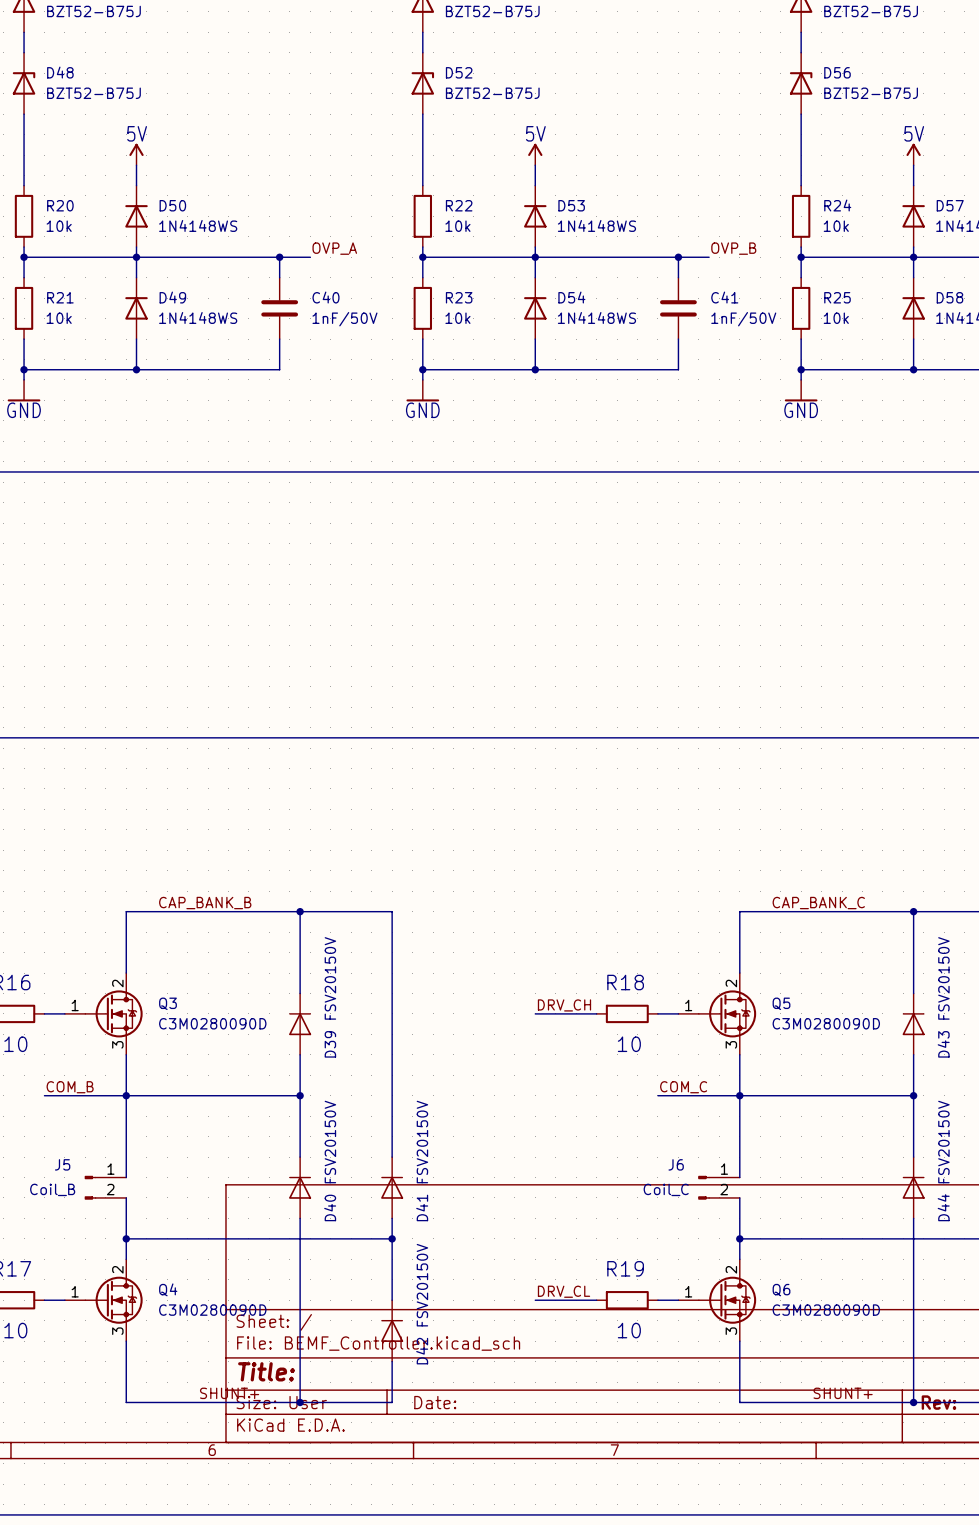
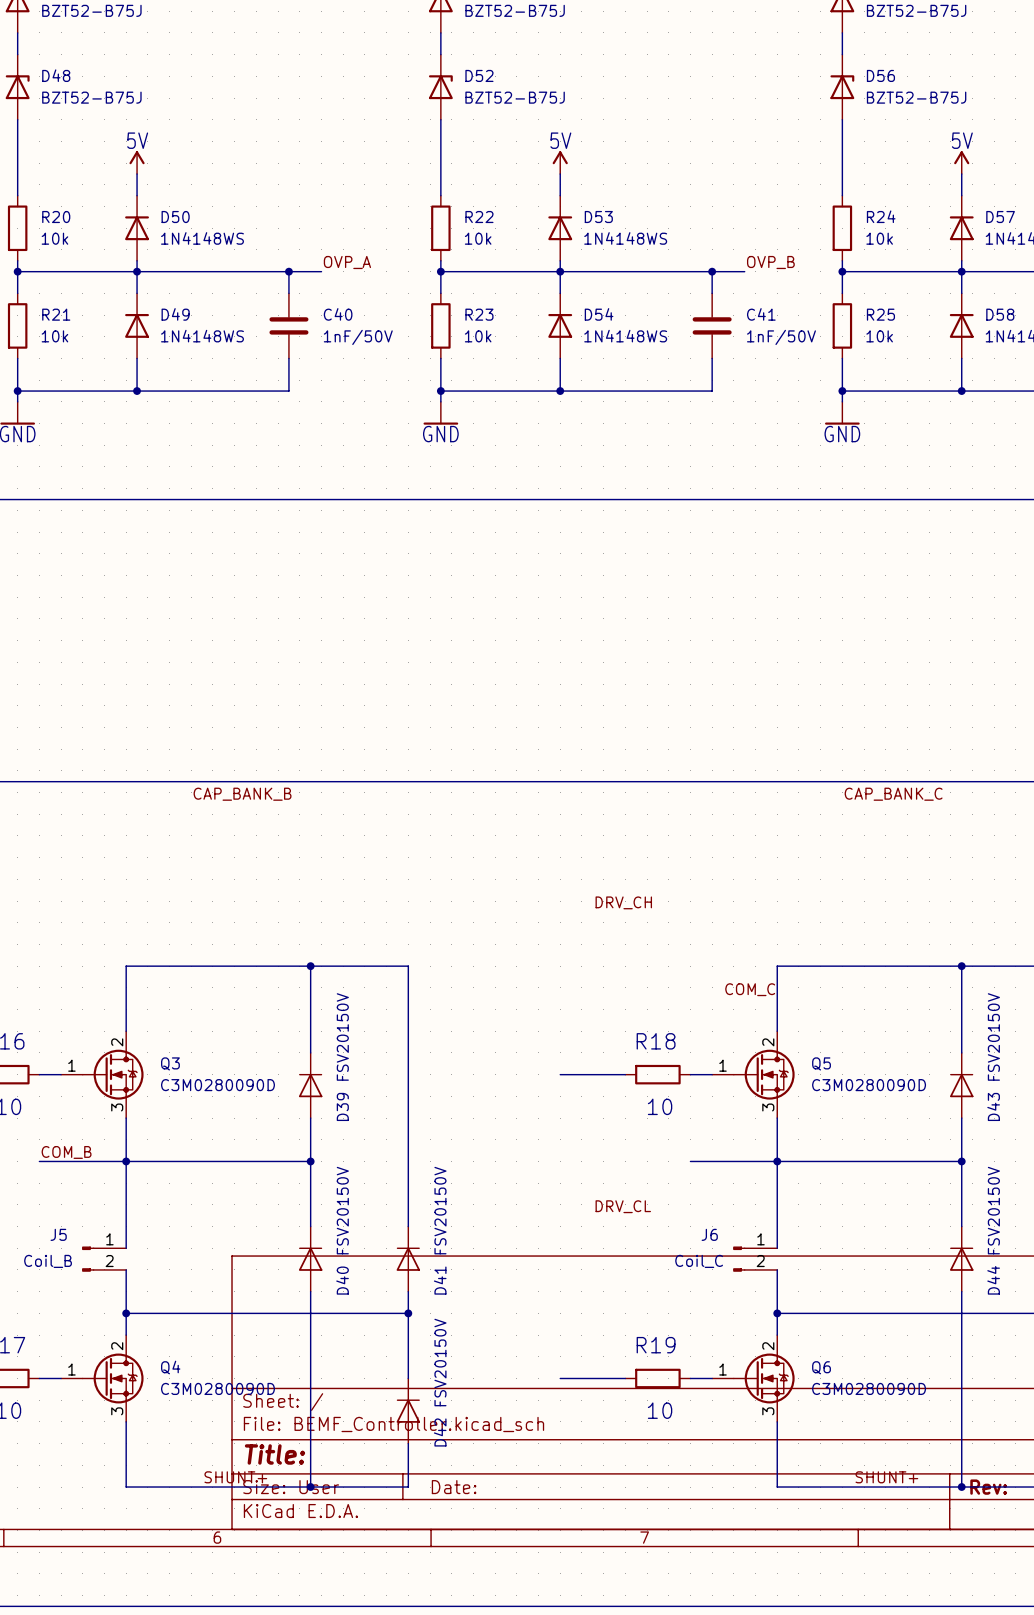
label position: CAP_BANK_B (205, 903) -> CAP_BANK_B (242, 794)
label position: CAP_BANK_C (818, 903) -> CAP_BANK_C (893, 794)
label position: DRV_CH (564, 1005) -> DRV_CH (623, 902)
label position: COM_C (683, 1087) -> COM_C (750, 989)
label position: DRV_CL (564, 1291) -> DRV_CL (623, 1206)

